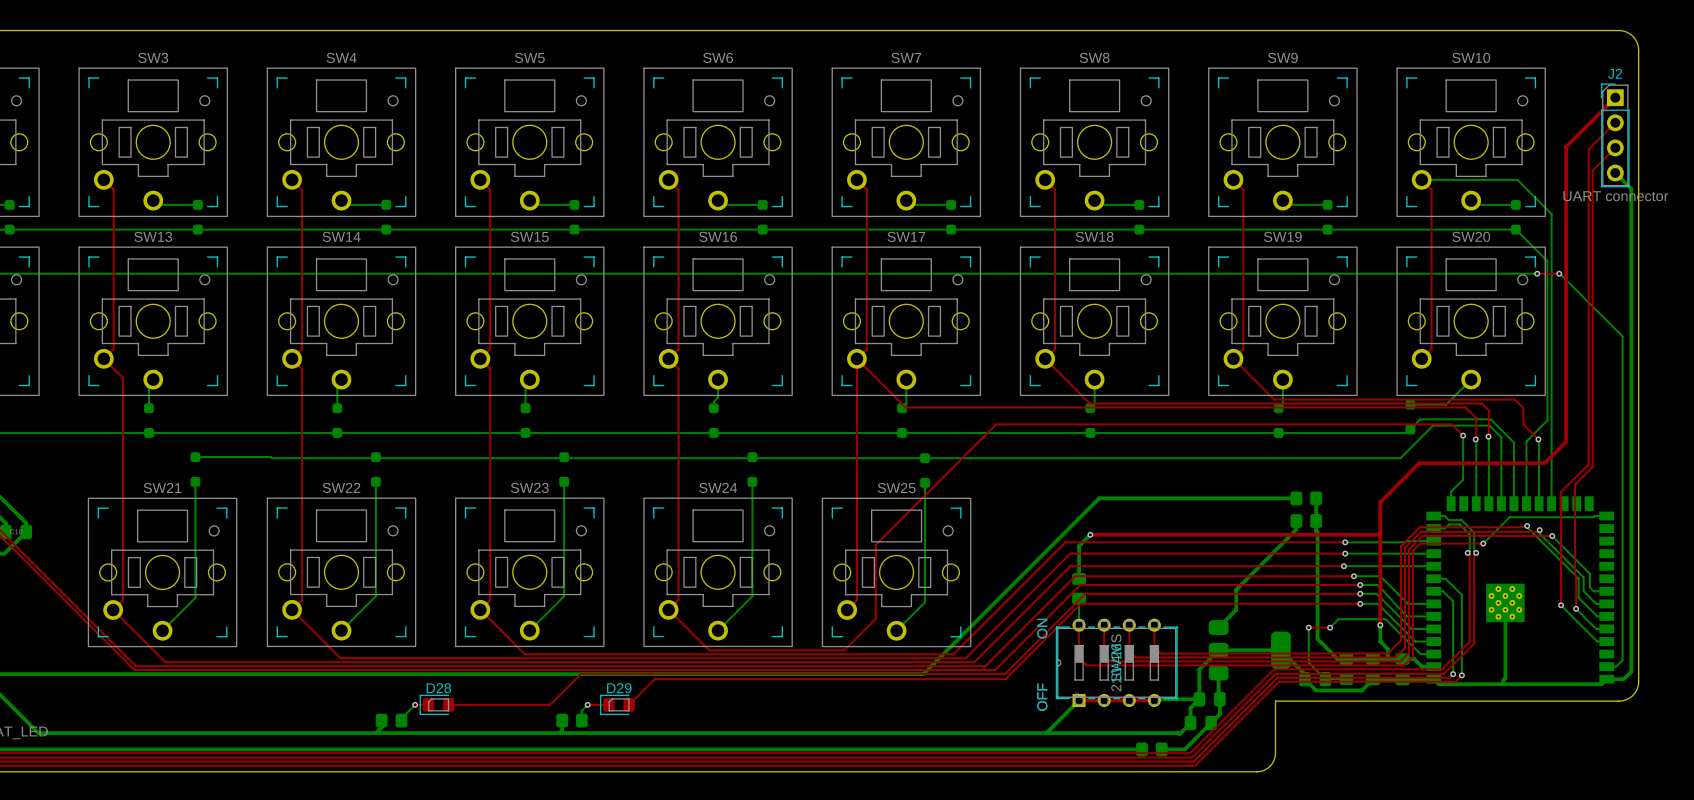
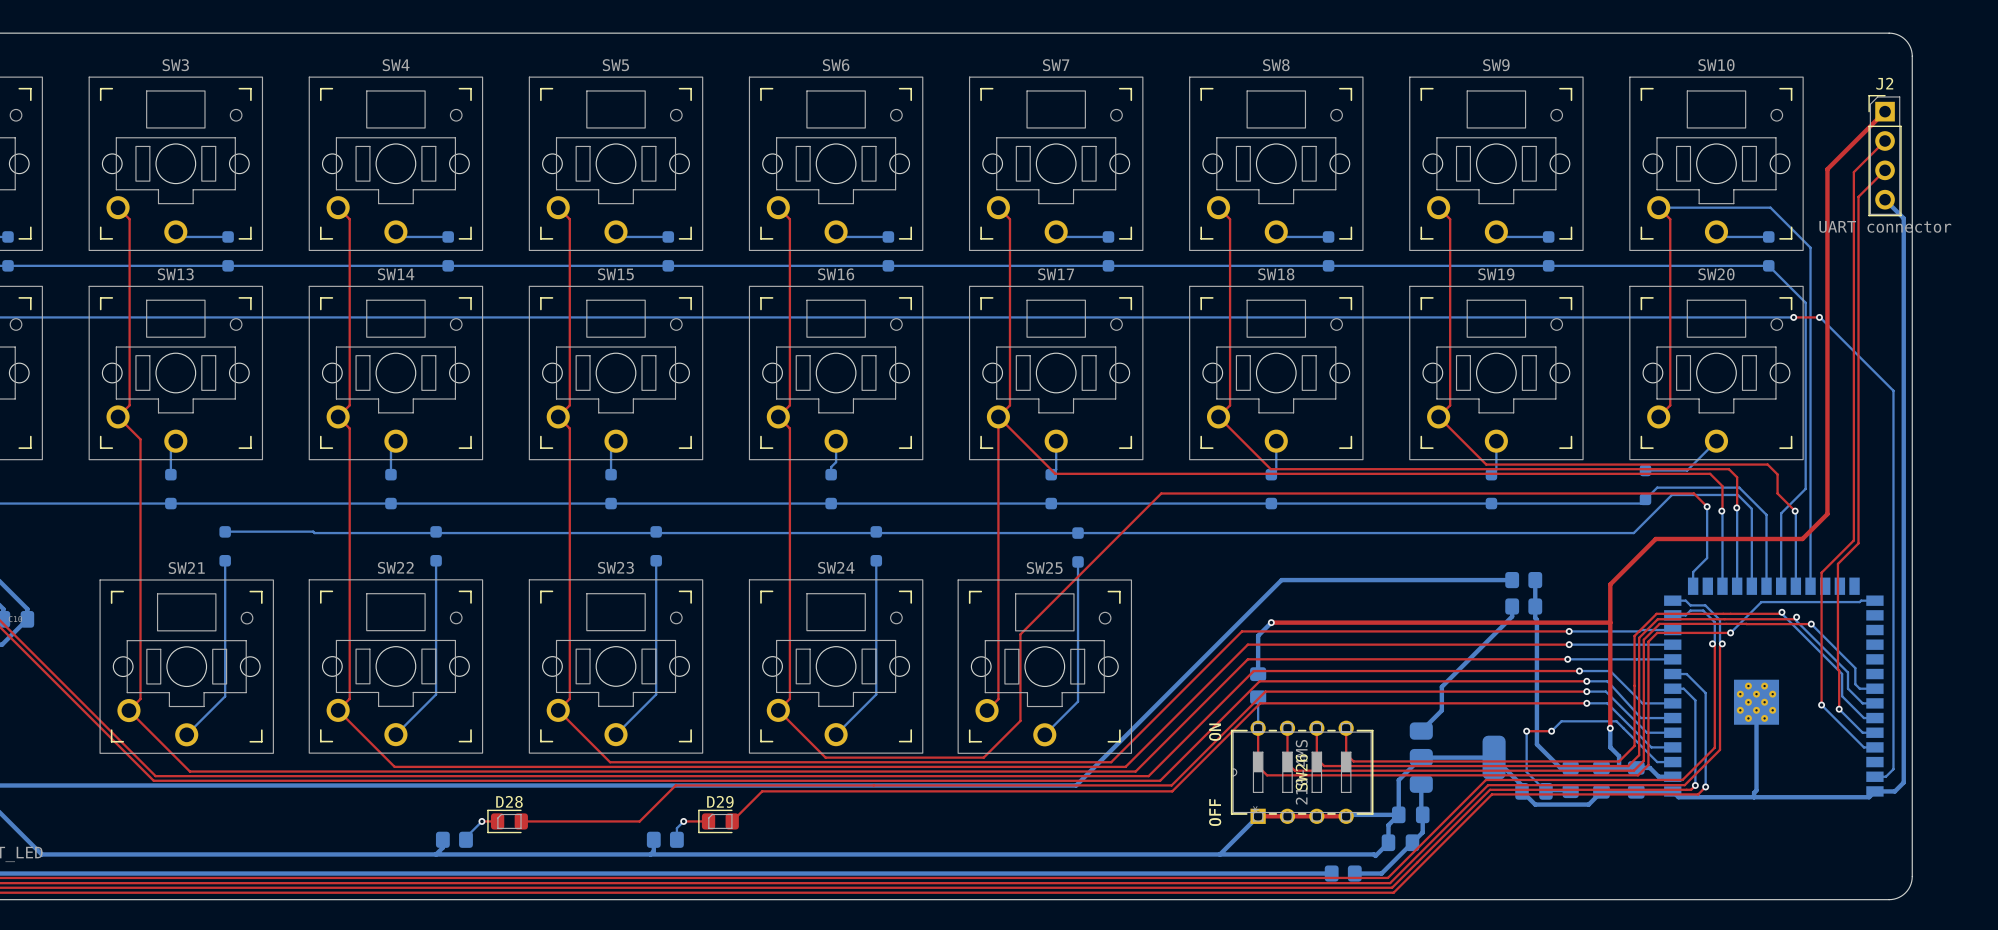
board edge: (1638, 681) (1632, 695) (1619, 701) (1275, 701) (1275, 757) (1268, 767) (1256, 771) -> (1912, 794) (1911, 881) (1905, 892) (1894, 899) (1465, 899)

